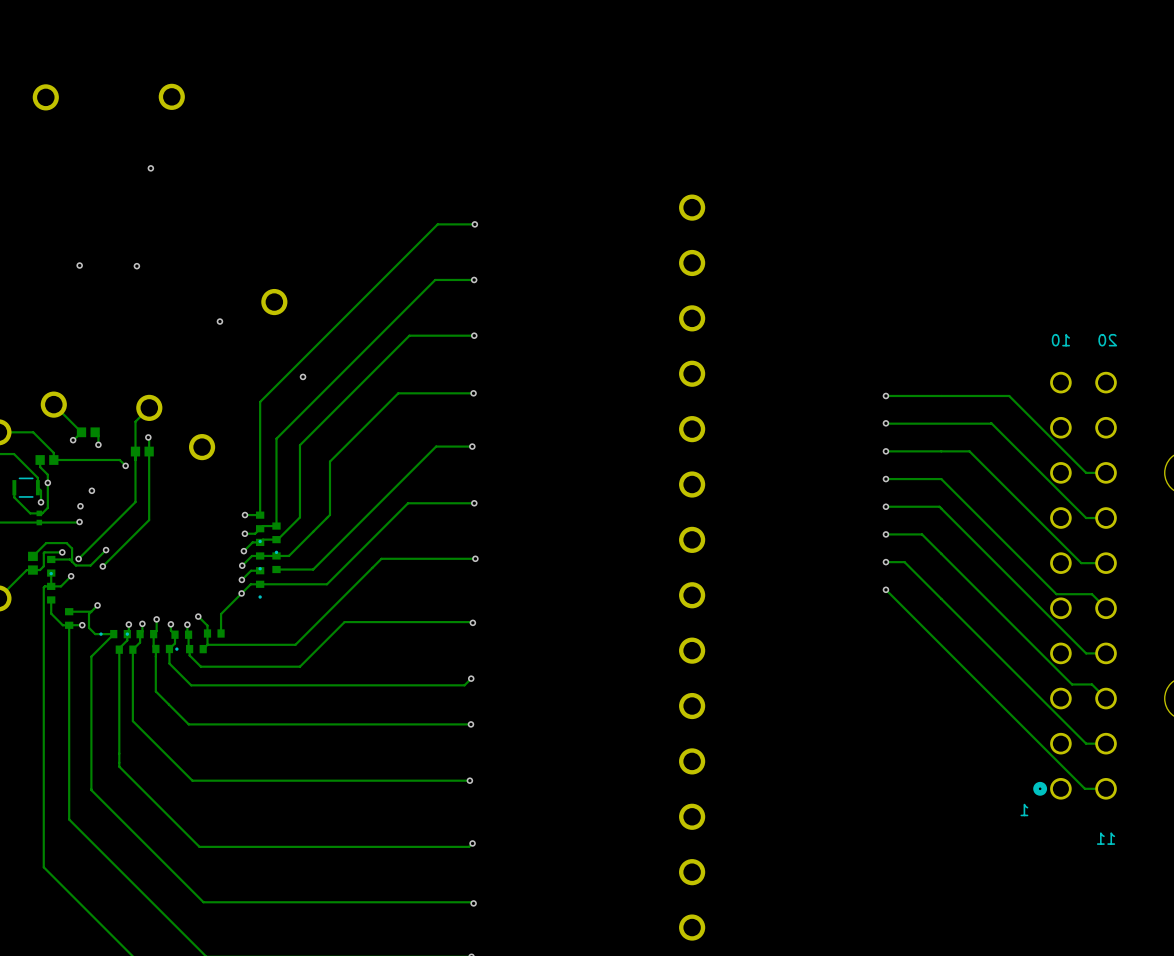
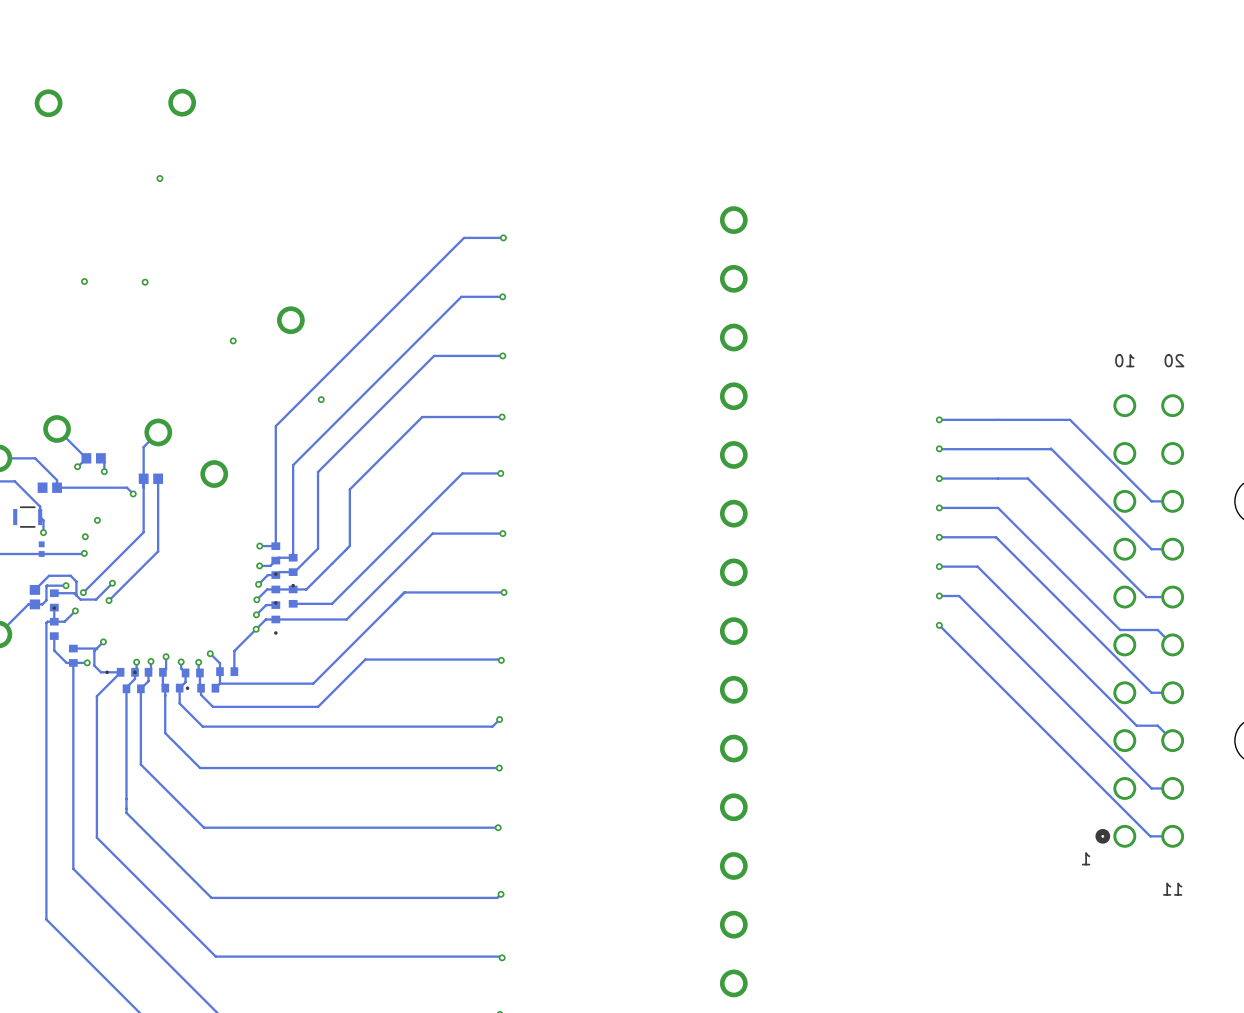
track: (148, 437) (149, 451) -> none
via: (148, 437) -> none
track: (40, 460) (40, 467) (47, 474) (47, 507) (42, 513) (30, 513) (14, 497) (14, 487) -> none
via: (47, 482) -> none

